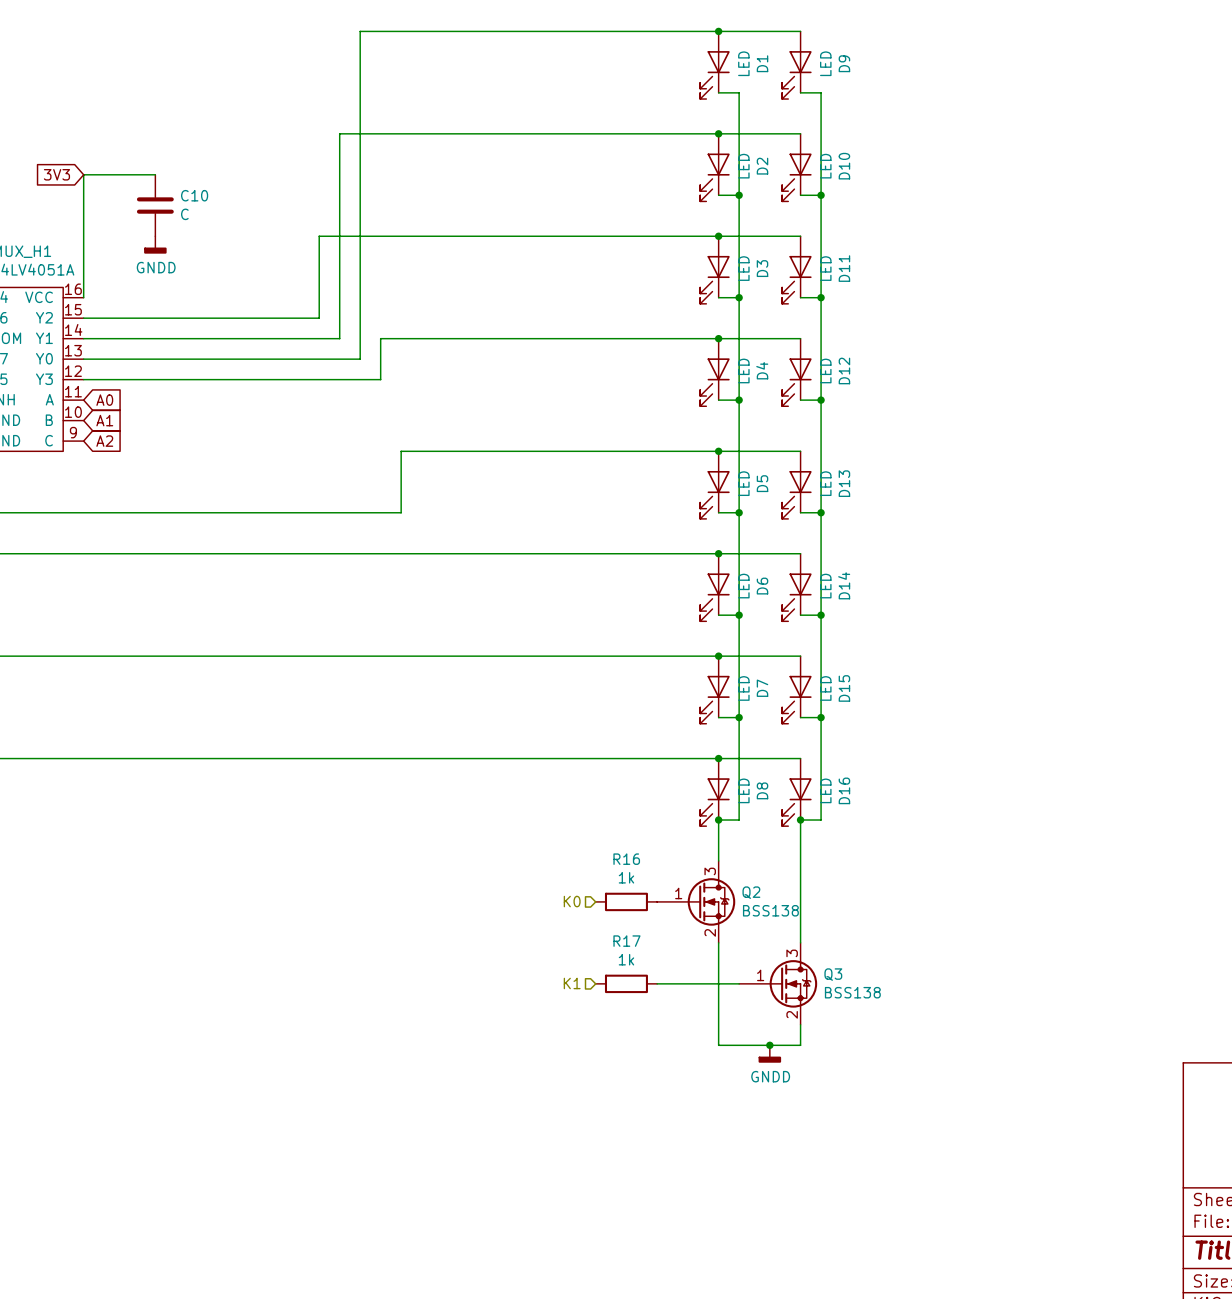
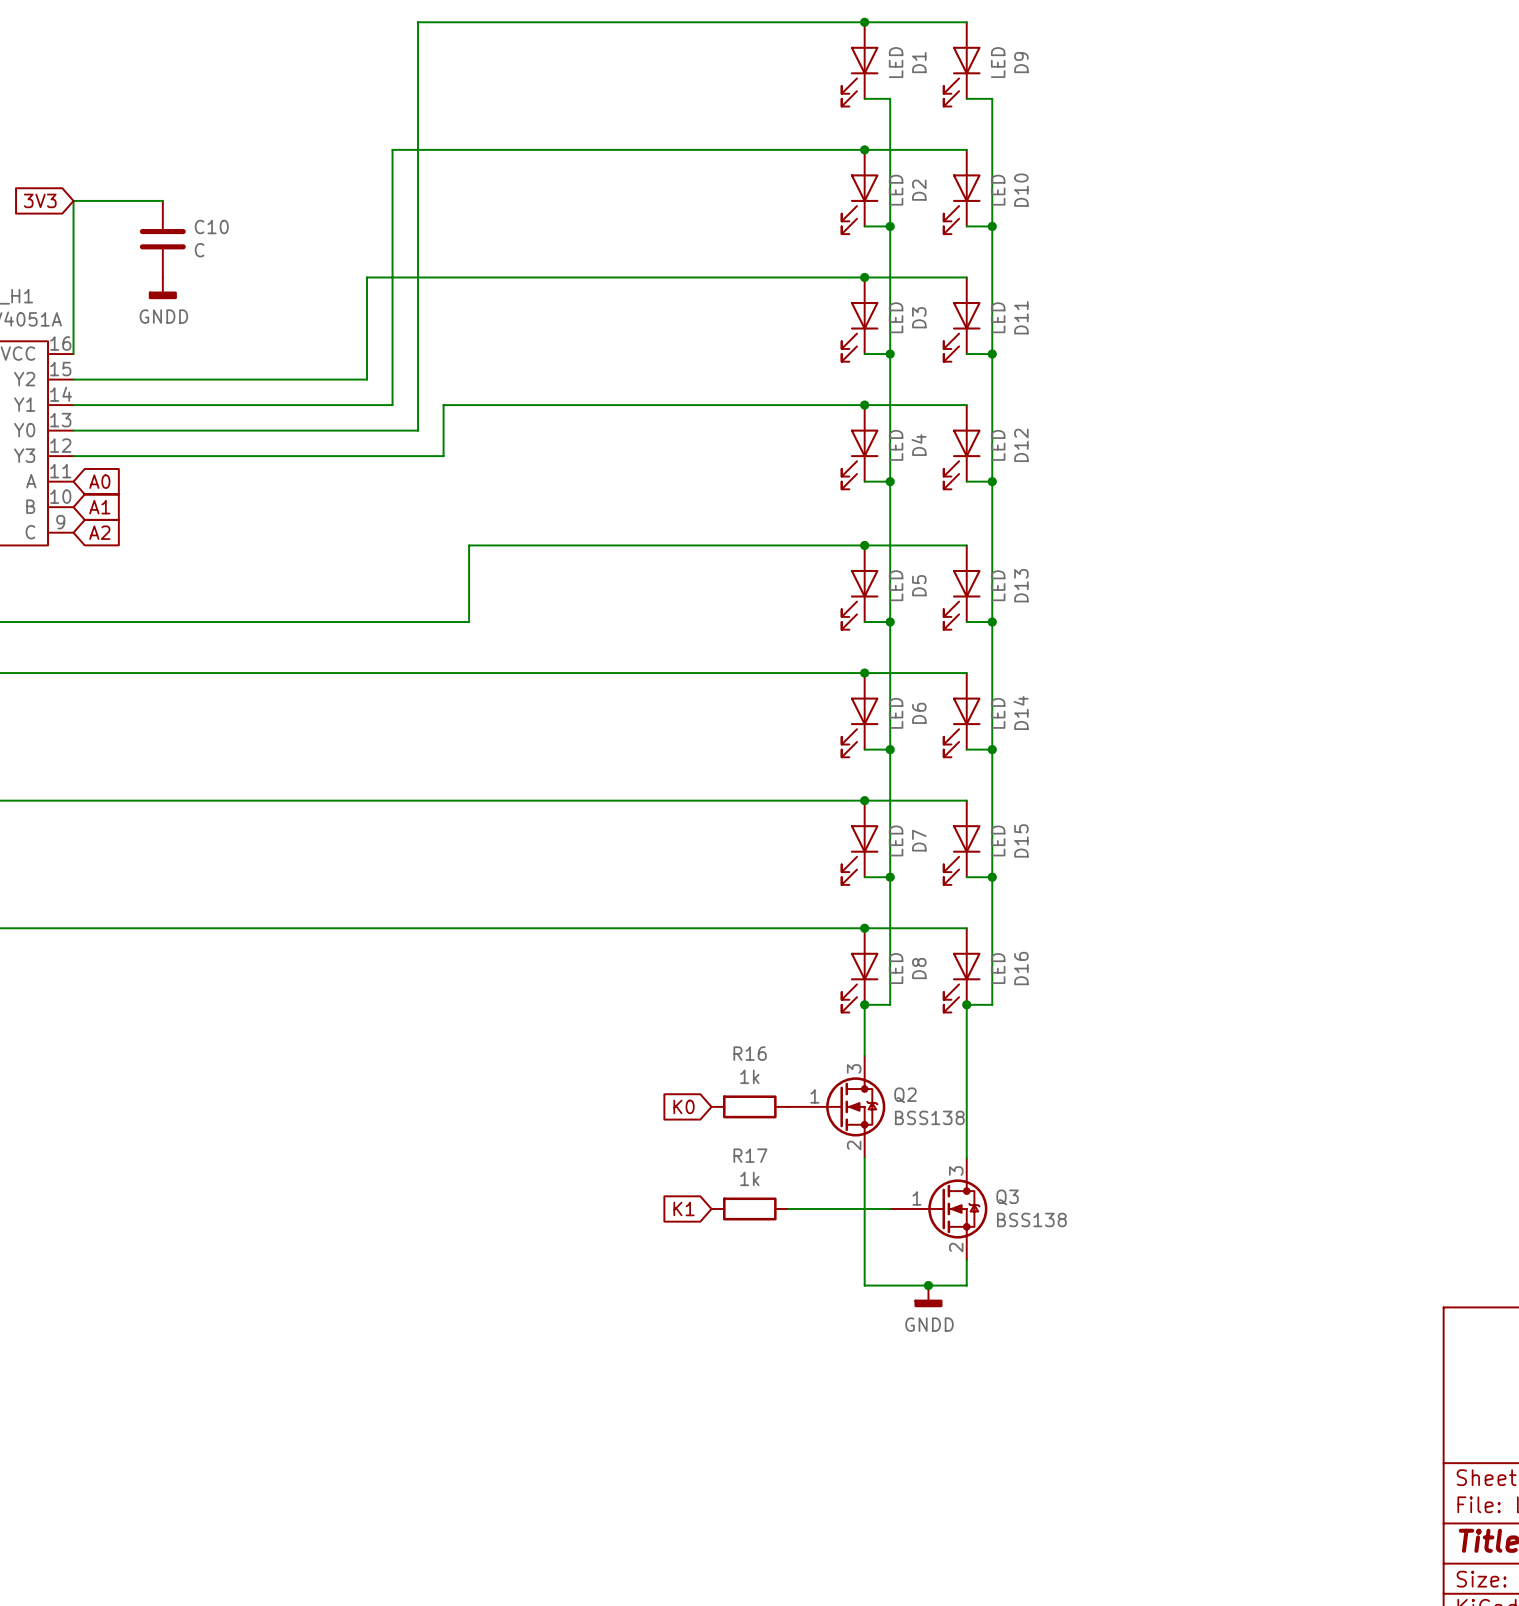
hierarchical label: K0 (572, 901) -> none
global label: none -> K0 (684, 1106)
hierarchical label: K1 (572, 983) -> none
global label: none -> K1 (684, 1208)

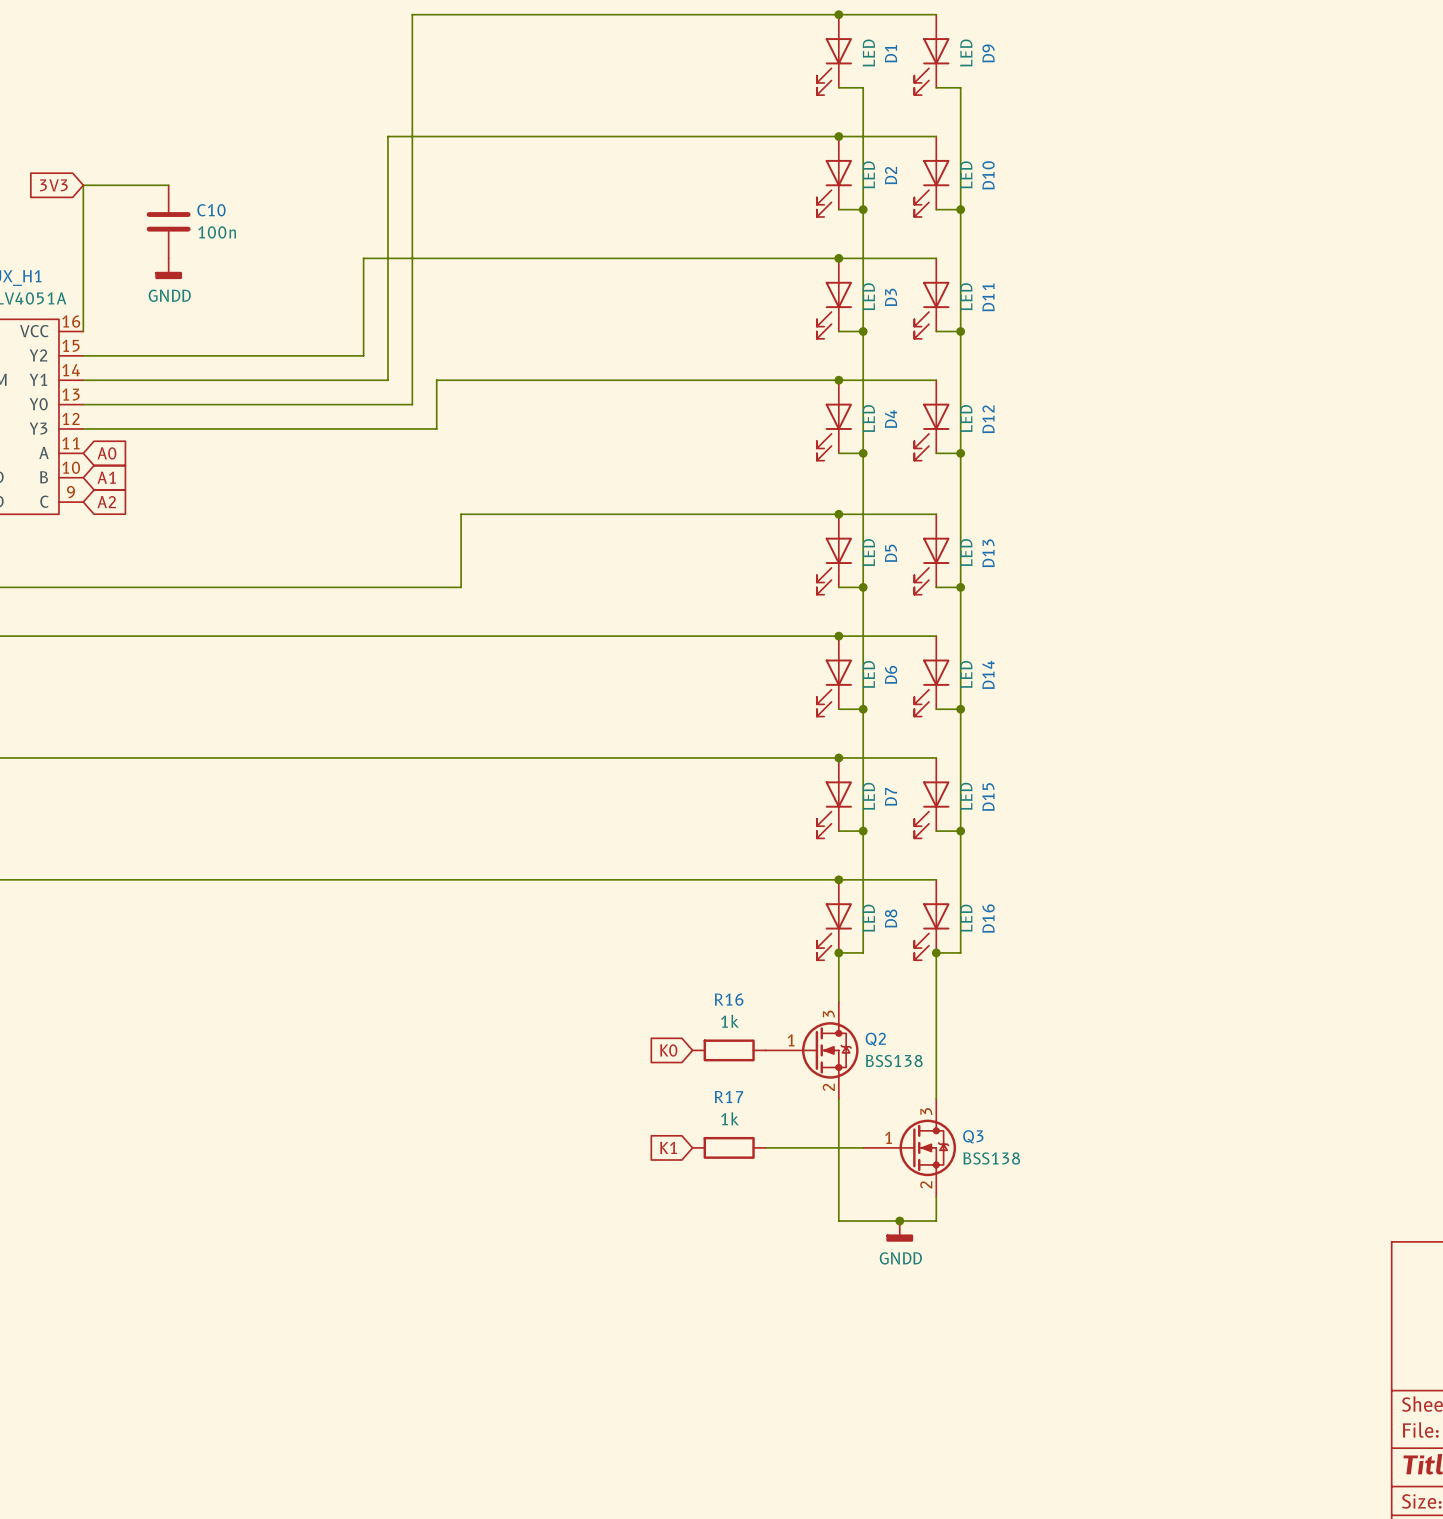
C10 value: C (199, 250) -> 100n (217, 232)

